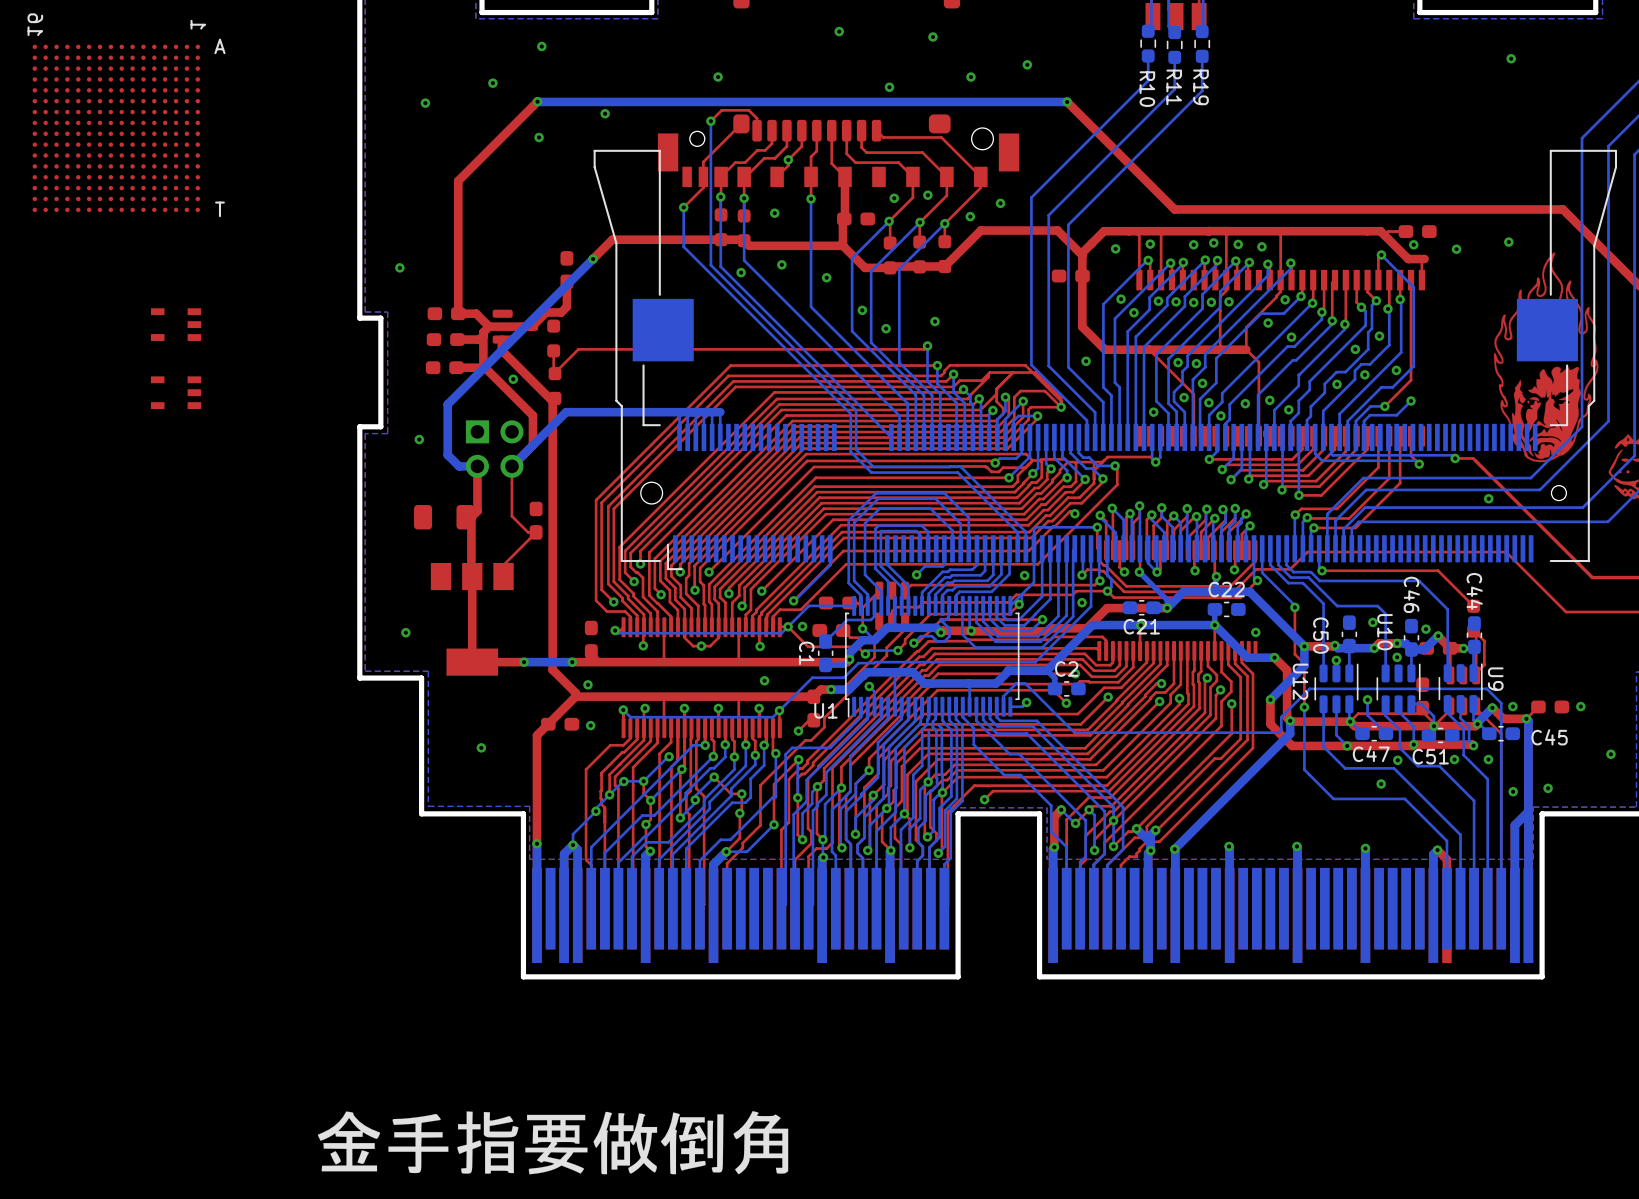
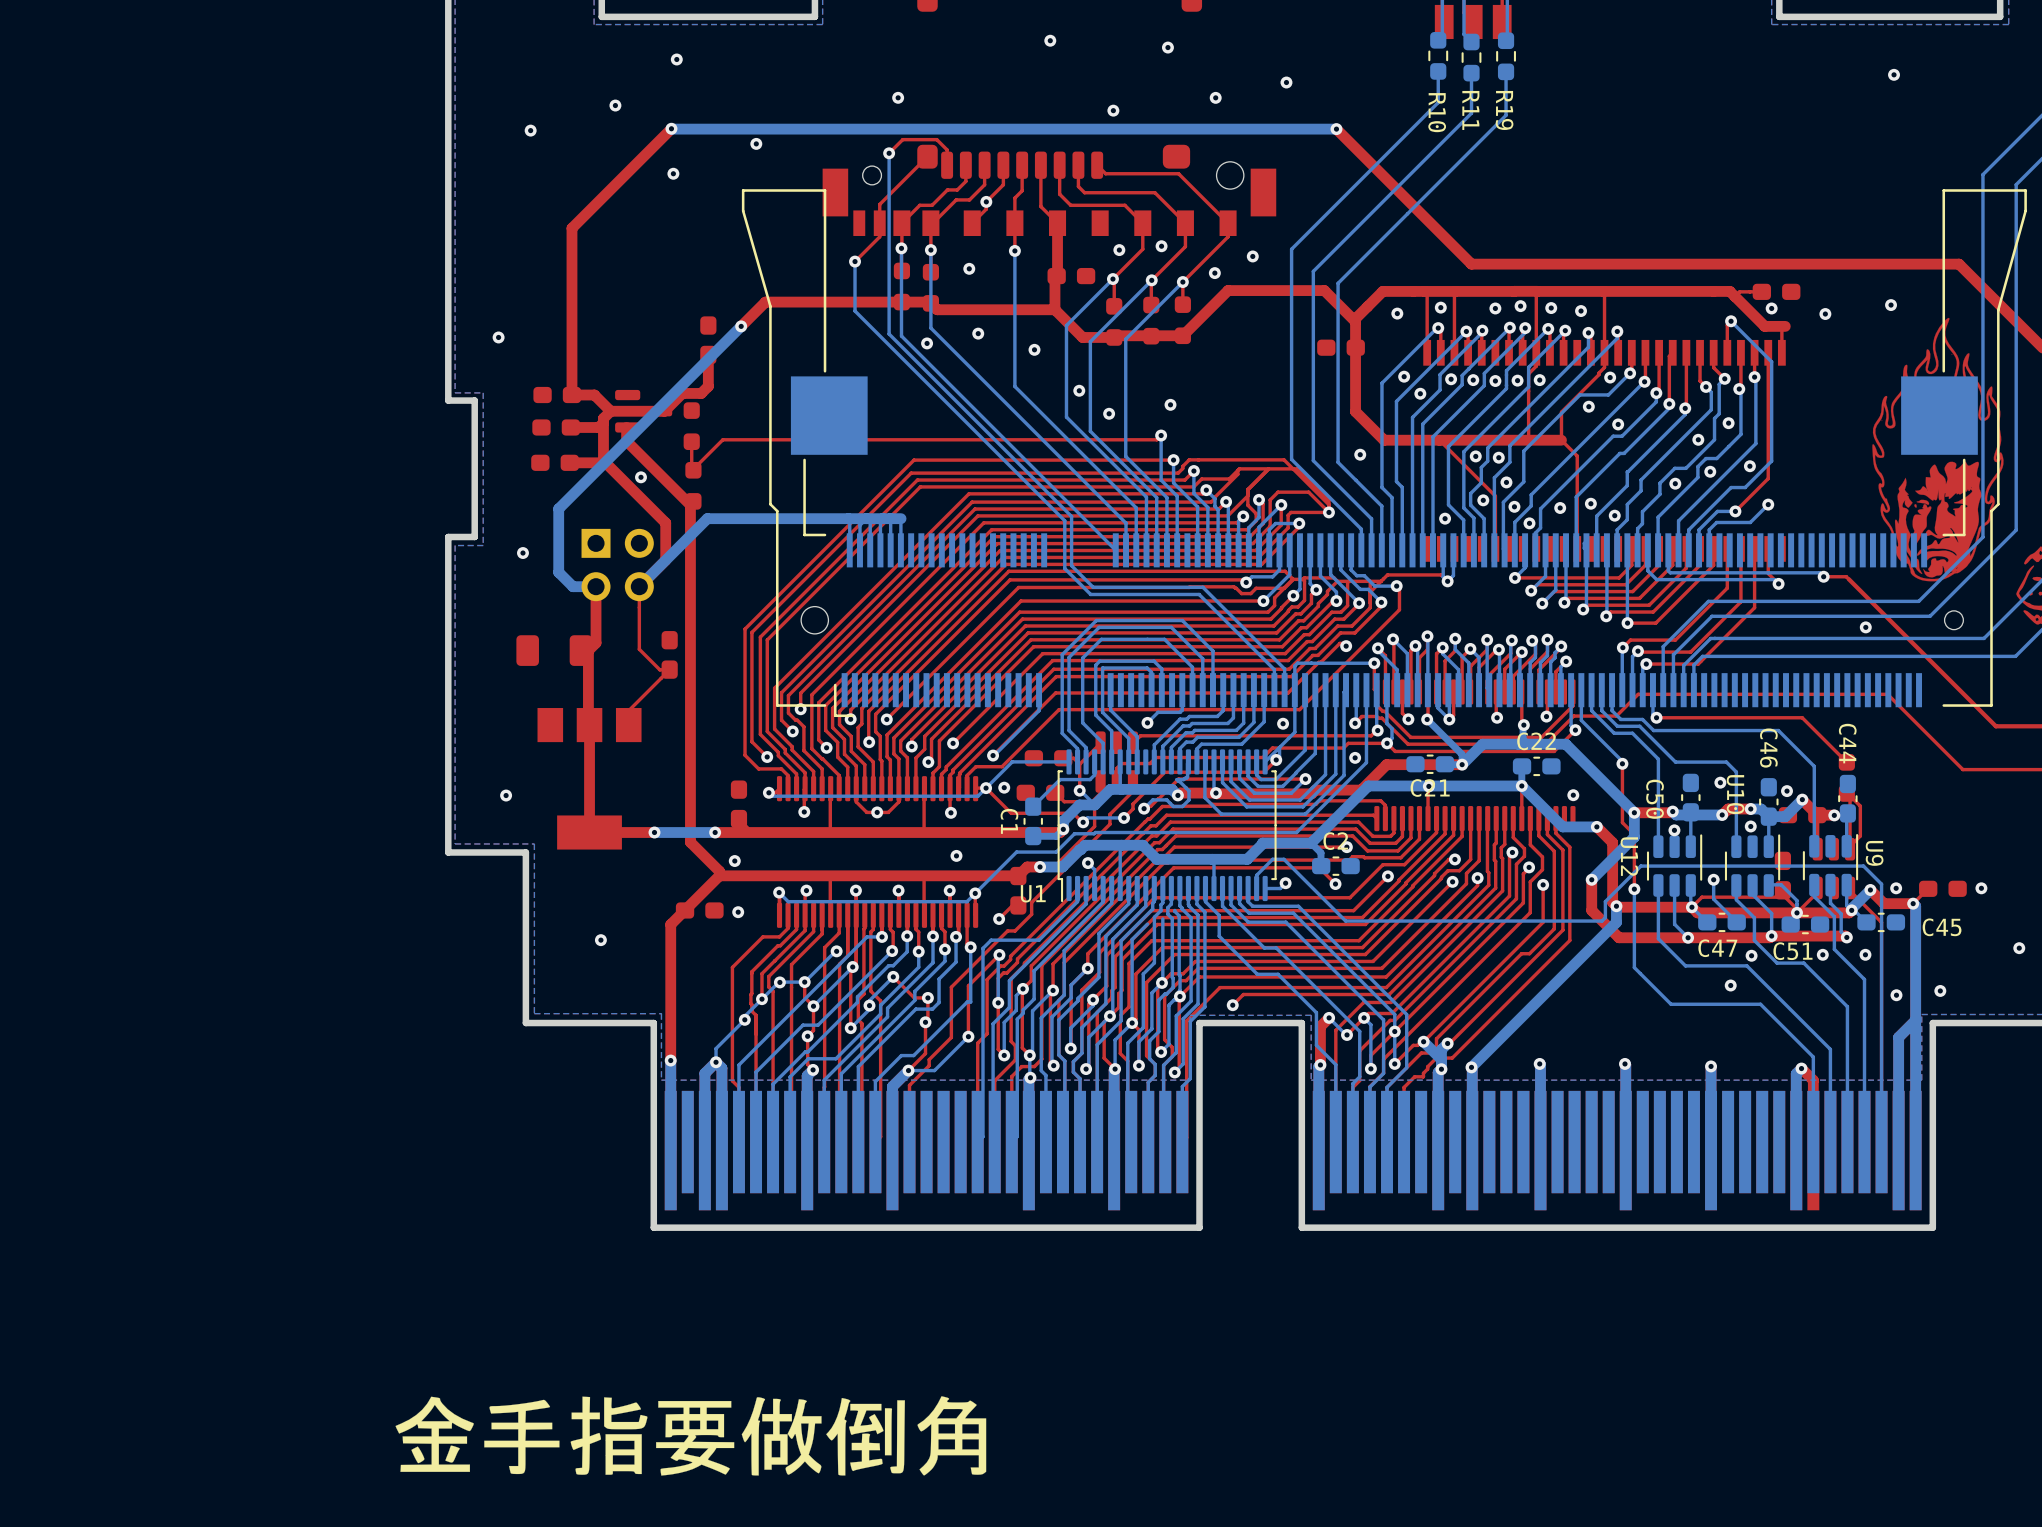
part: (116, 128) -> none
part: (176, 324) -> none
part: (176, 392) -> none

